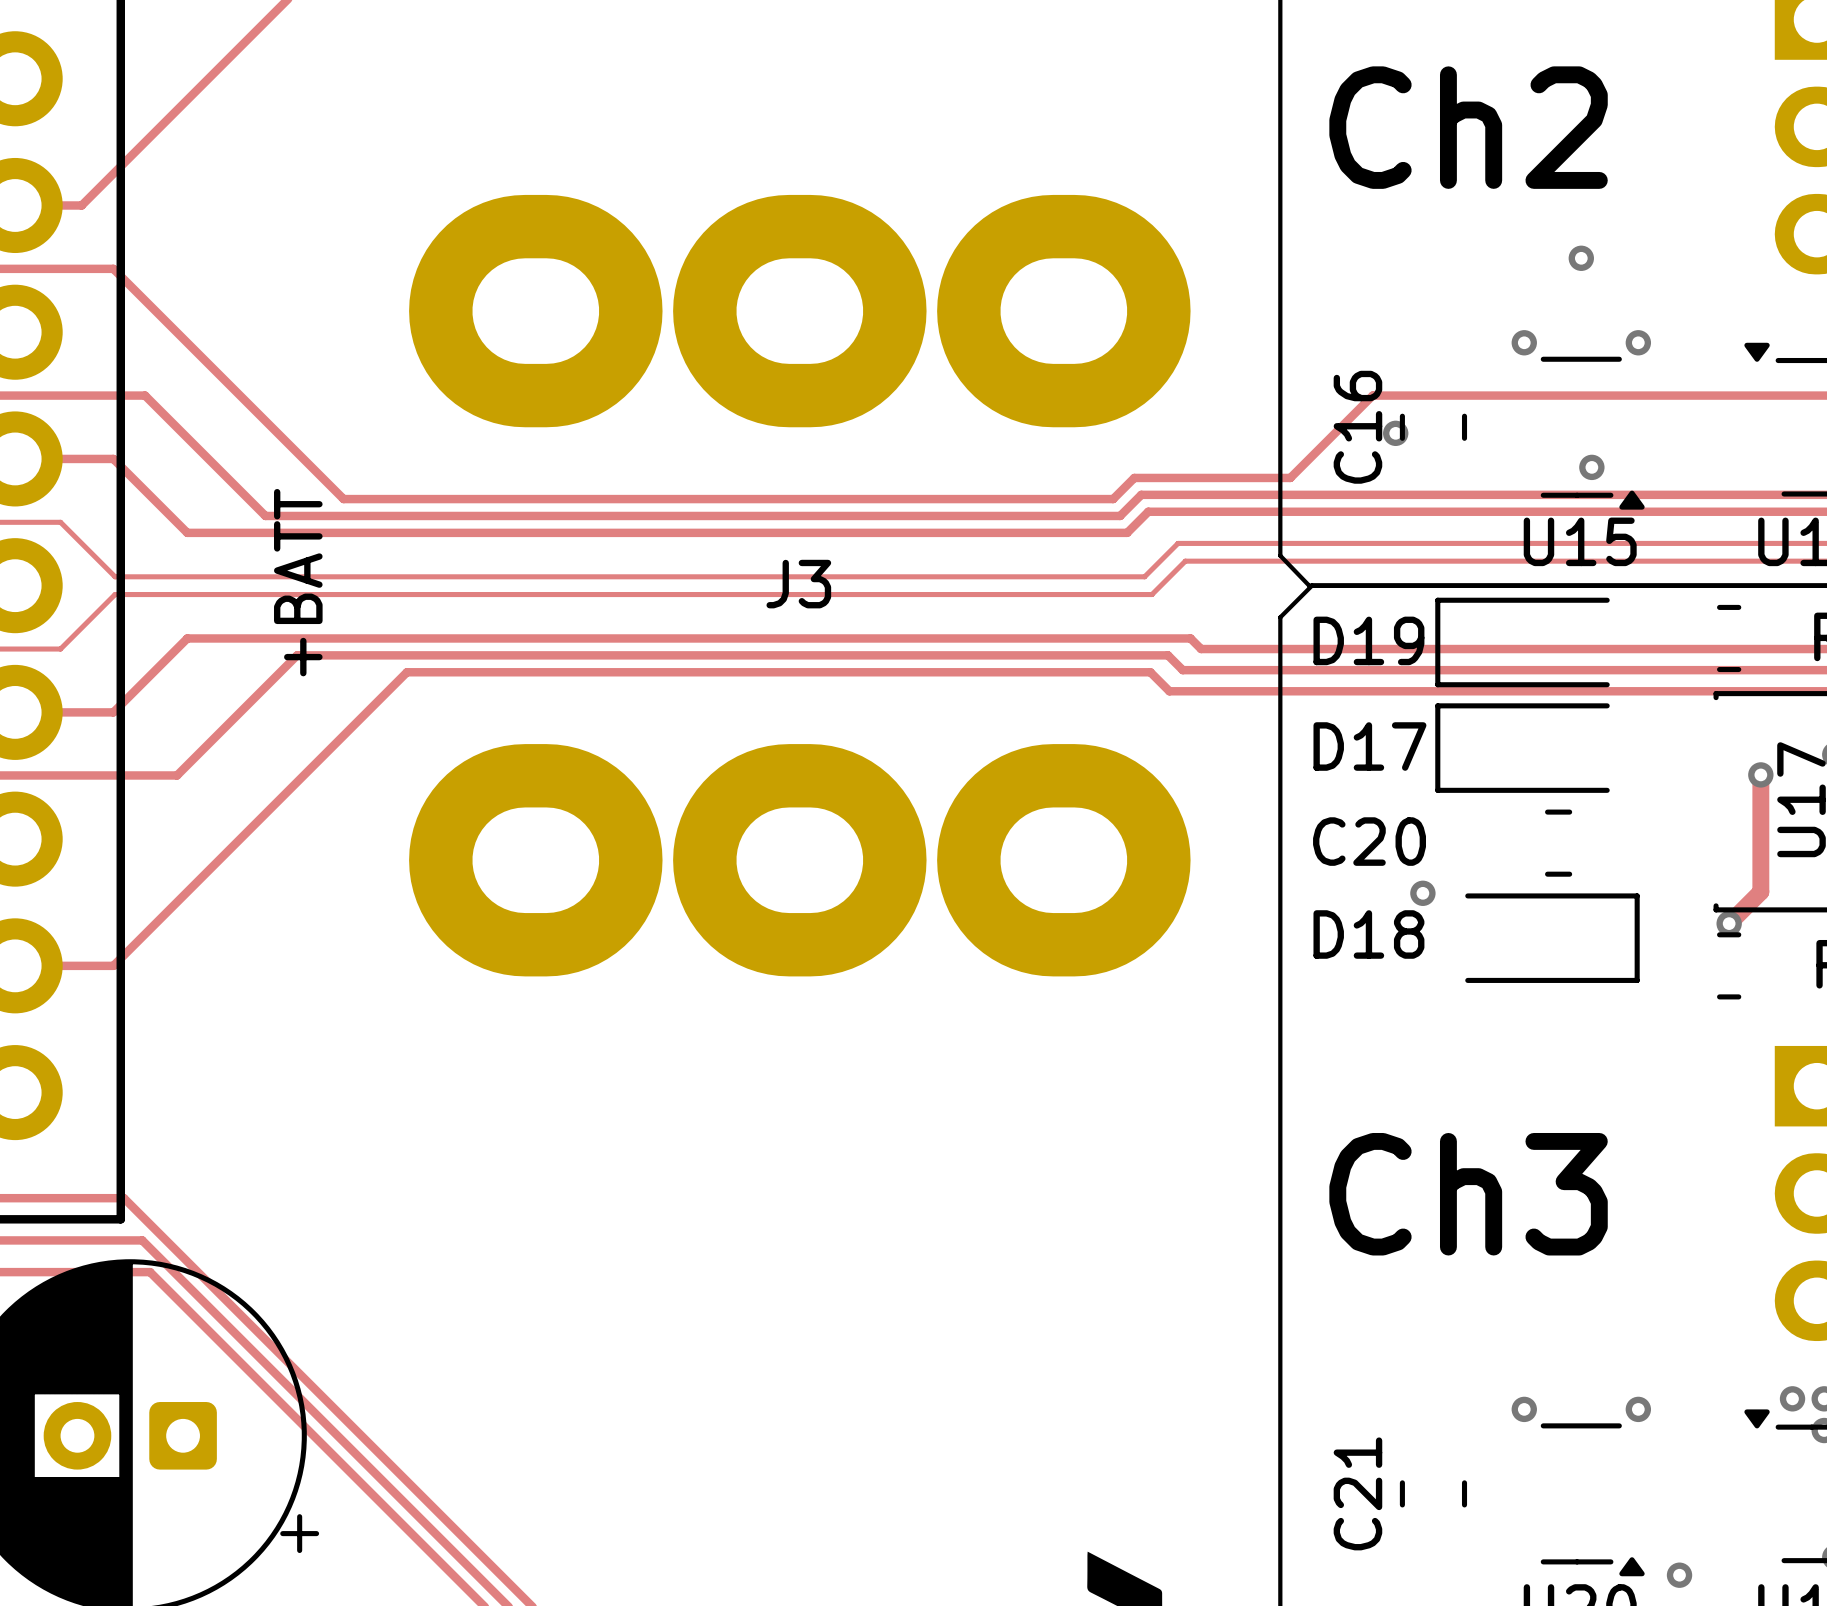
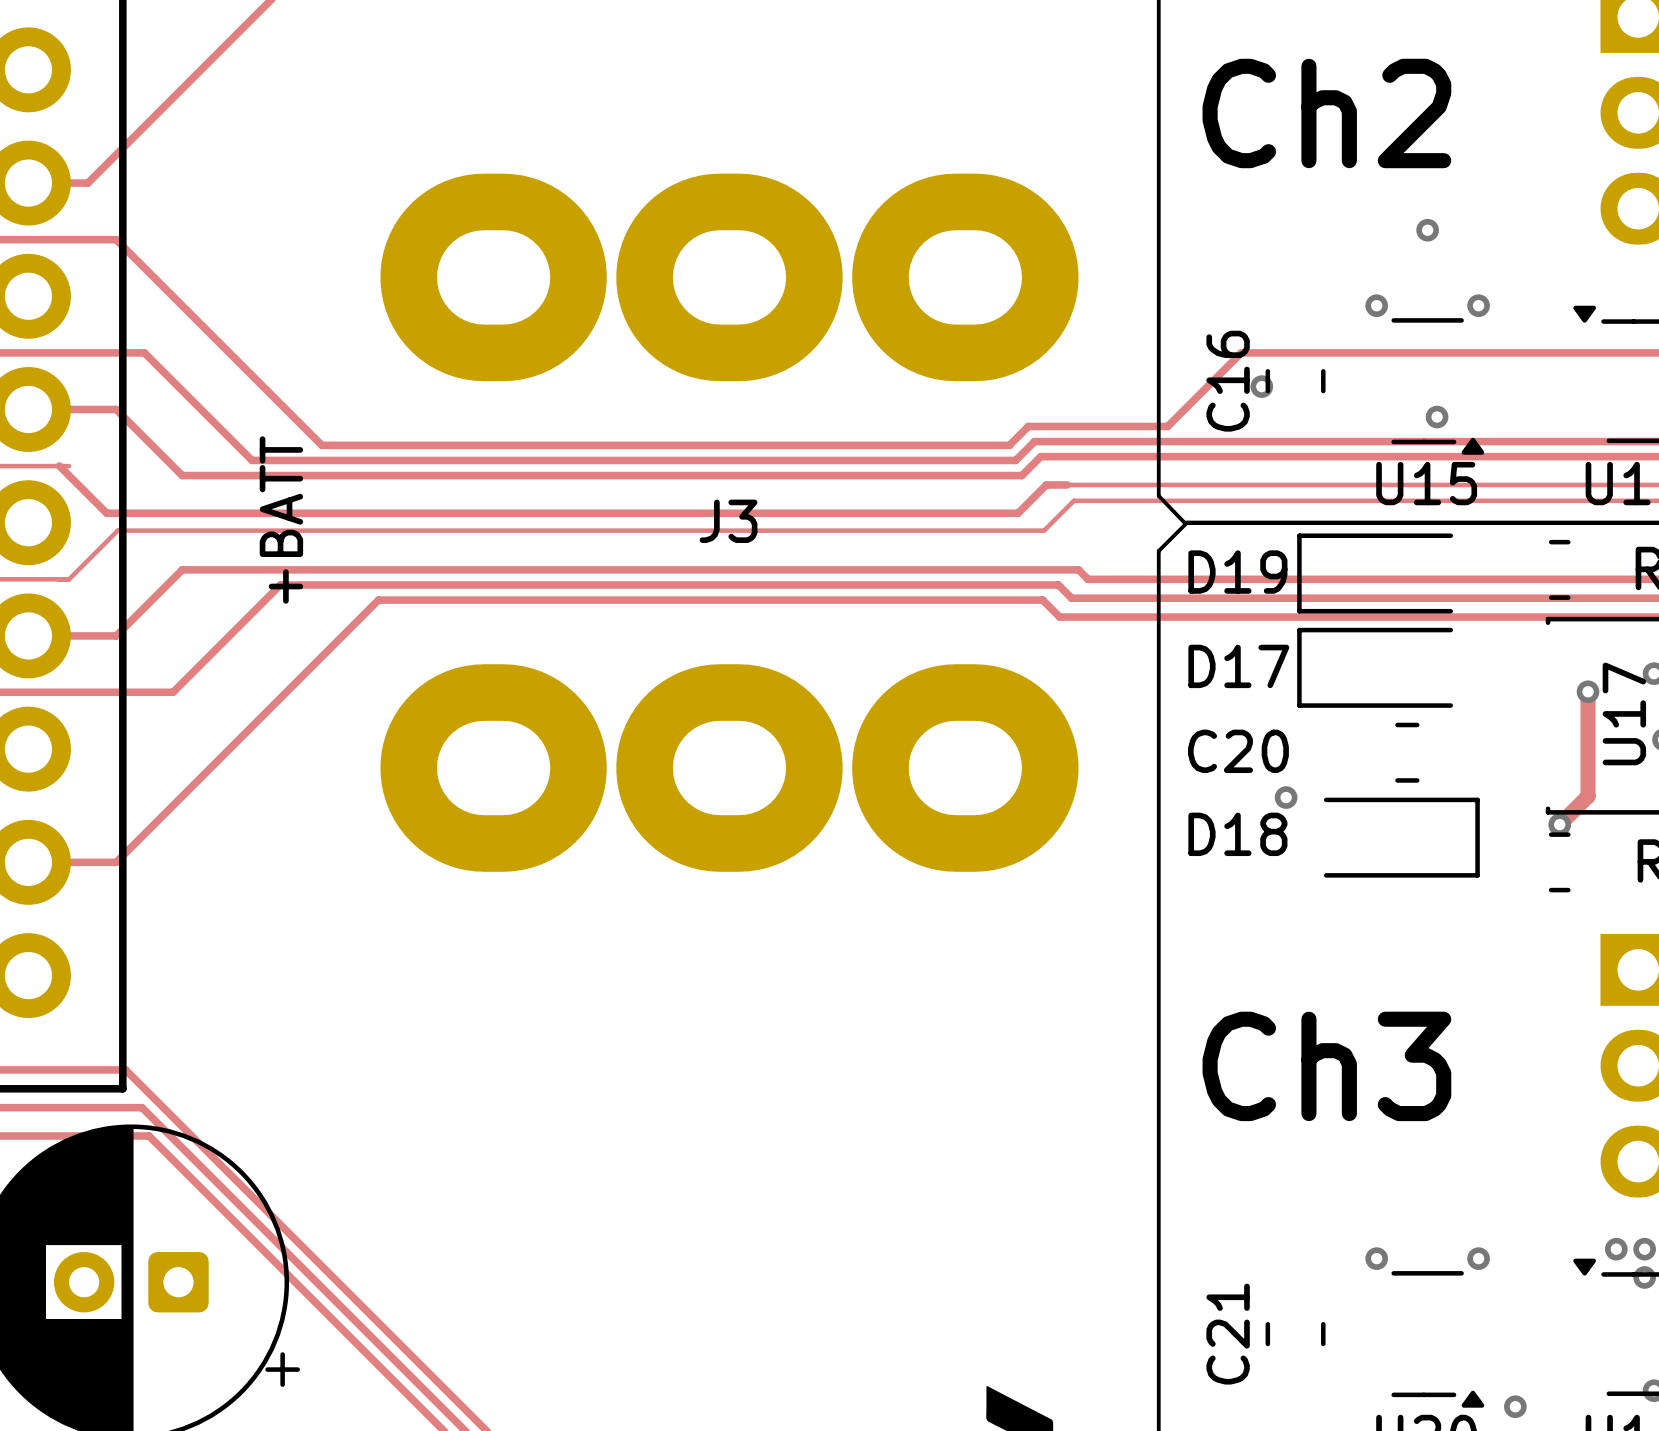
track: (60, 522) (115, 576) (1144, 576) (1178, 543) -> (59, 465) (106, 513) (1018, 513) (1046, 484) (1067, 484)

